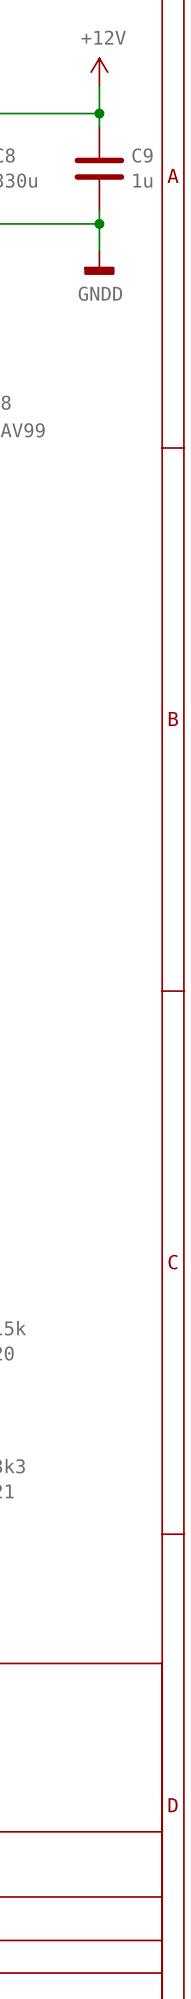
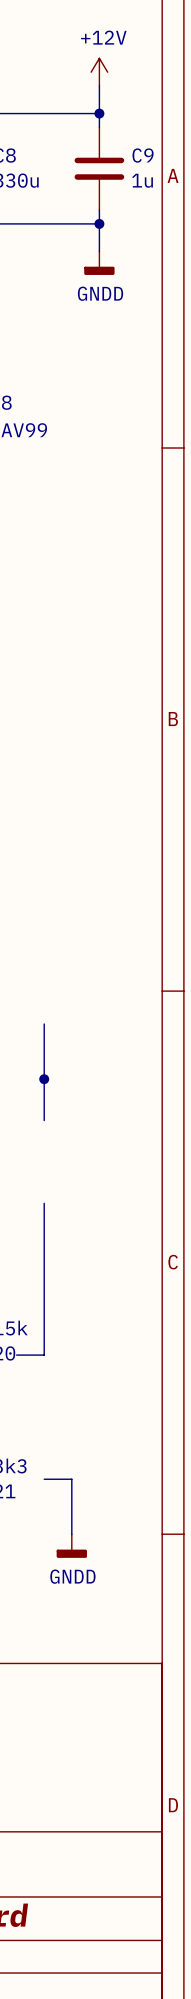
wire: none -> (44, 1024) (44, 1120)
junction: none -> (44, 1079)
wire: none -> (44, 1203) (44, 1355) (16, 1355)
wire: none -> (44, 1479) (71, 1479) (71, 1534)
power symbol: none -> GNDD (71, 1546)

